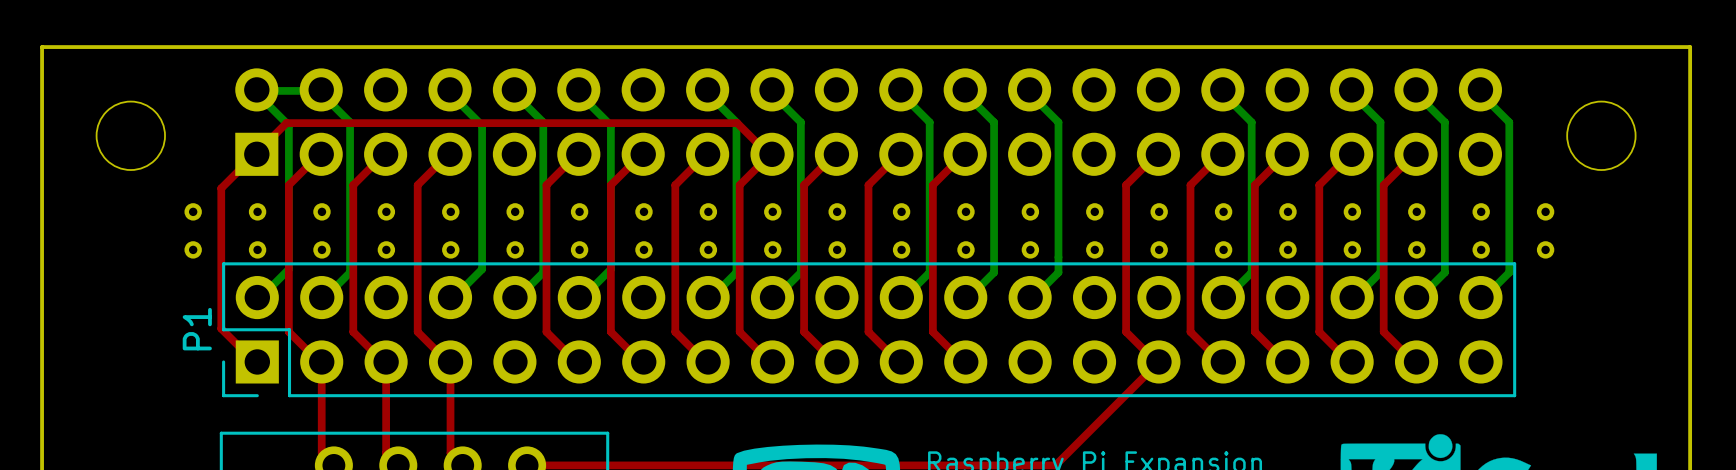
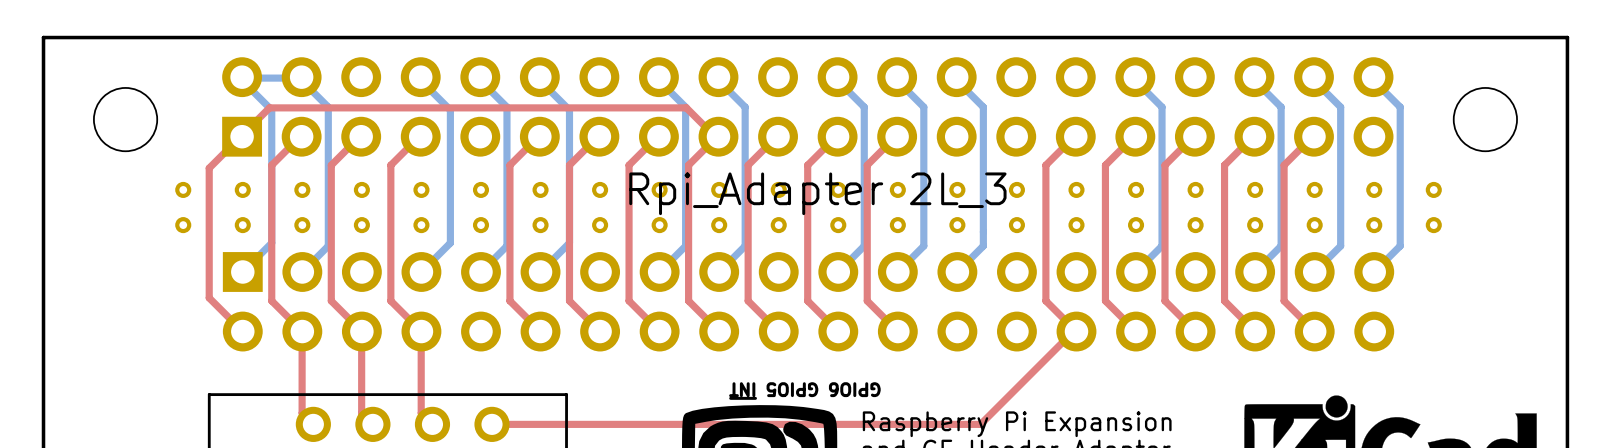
text: none -> Rpi_Adapter 2L_3 (817, 193)
P1 side: top (869, 329) -> bottom (808, 301)
text: none -> GPIO6 GPIO5 ~{INT} (804, 391)

